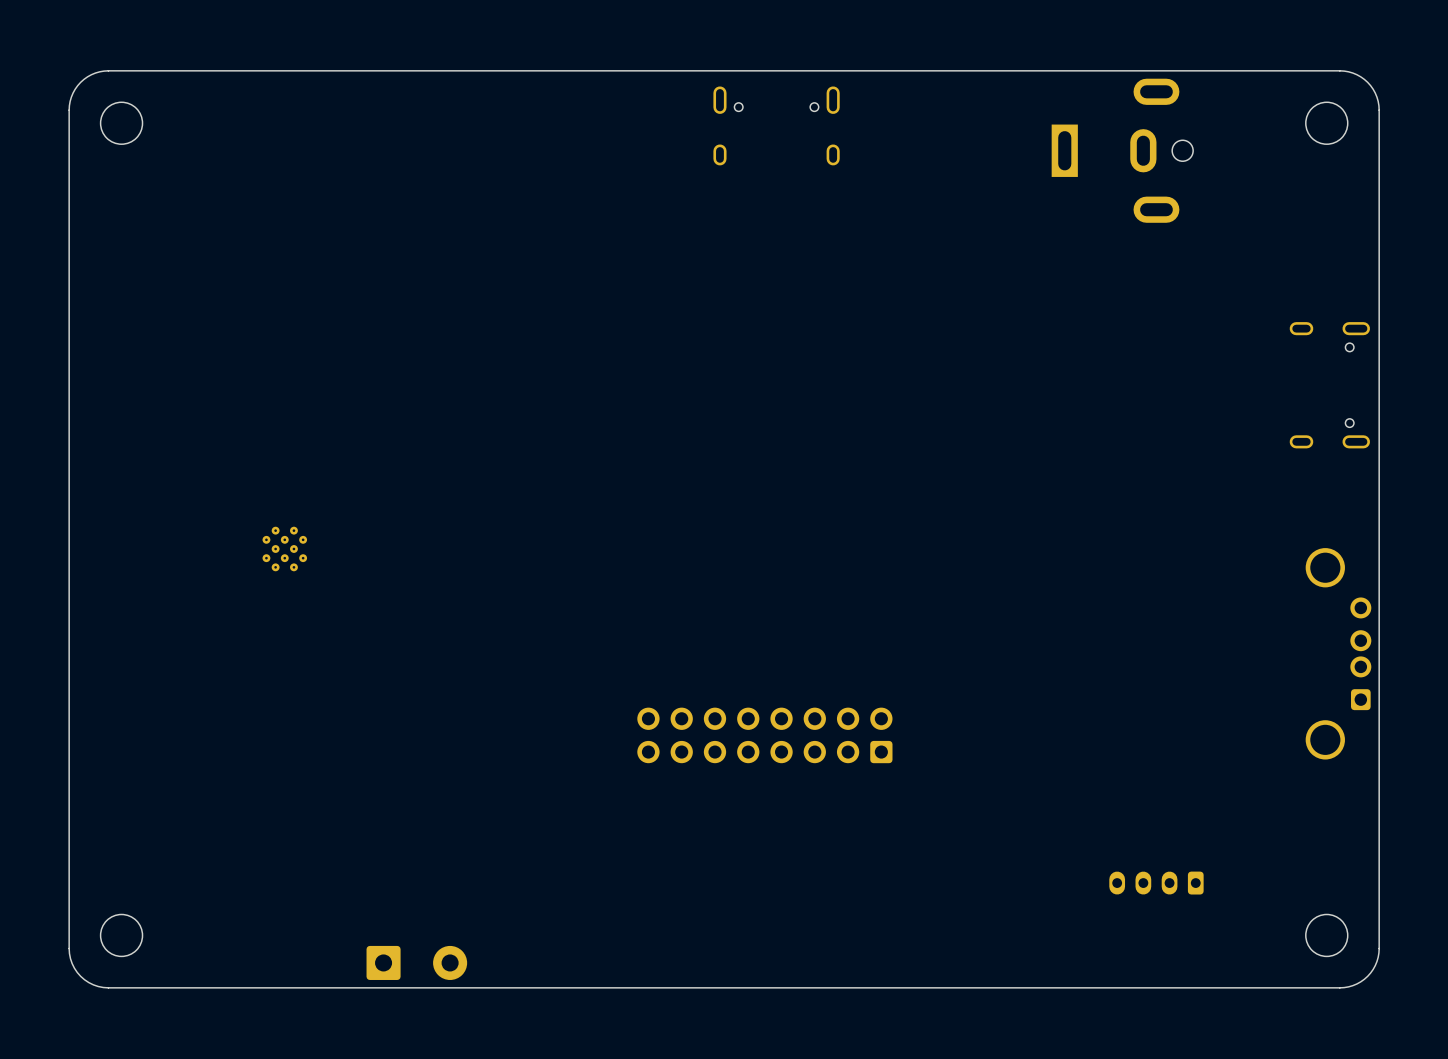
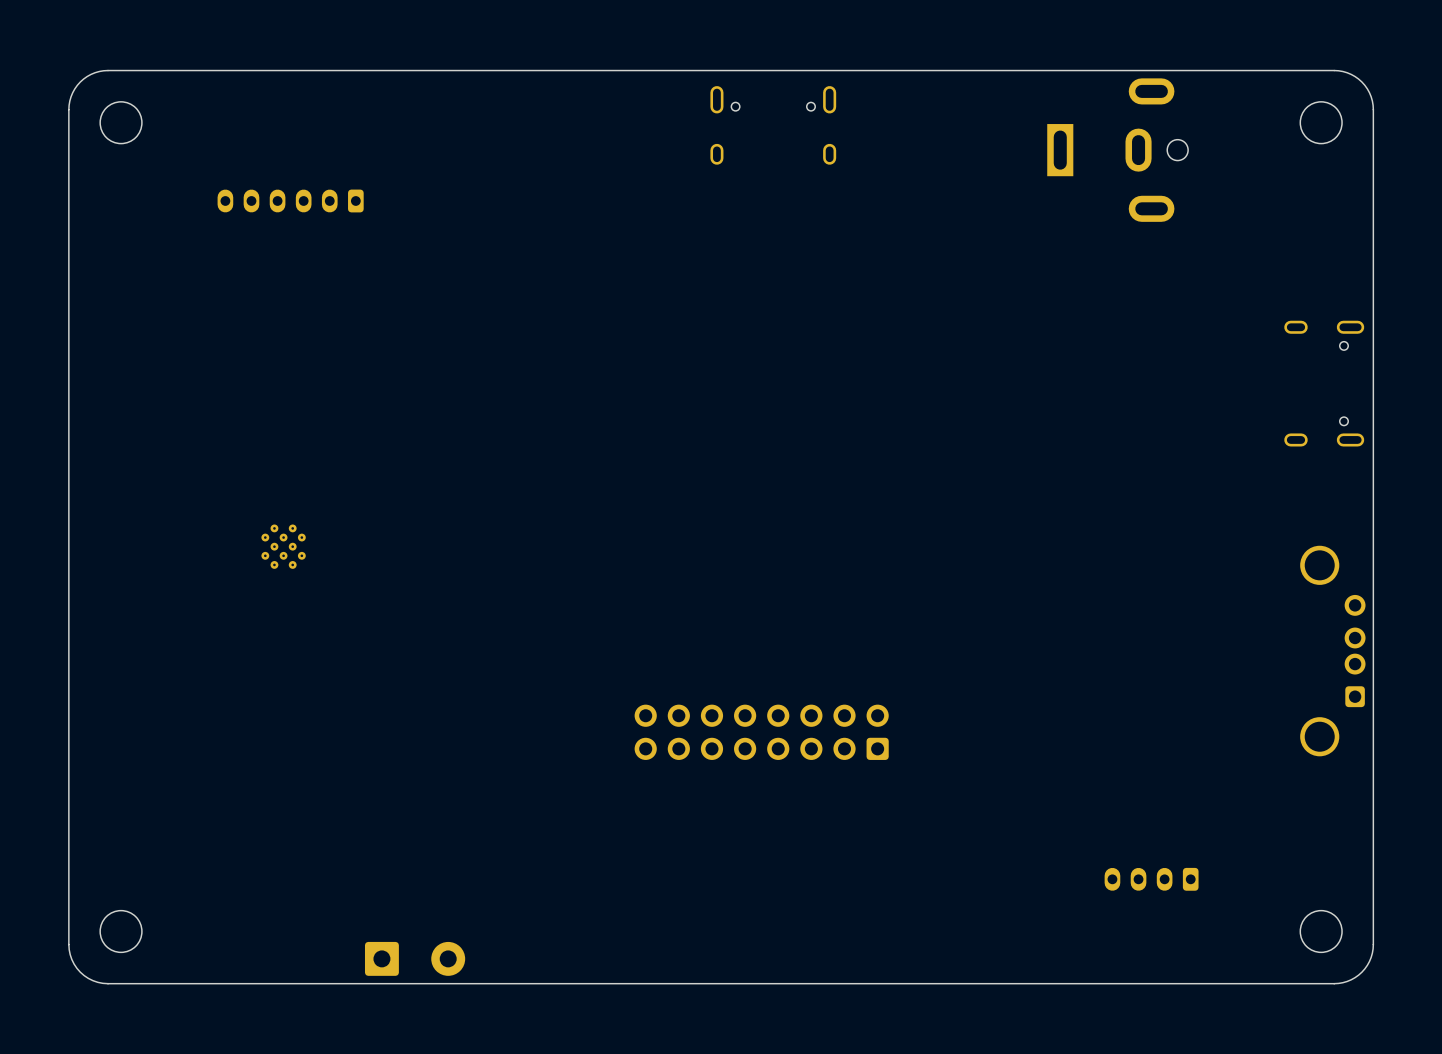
part: none -> (290, 200)

